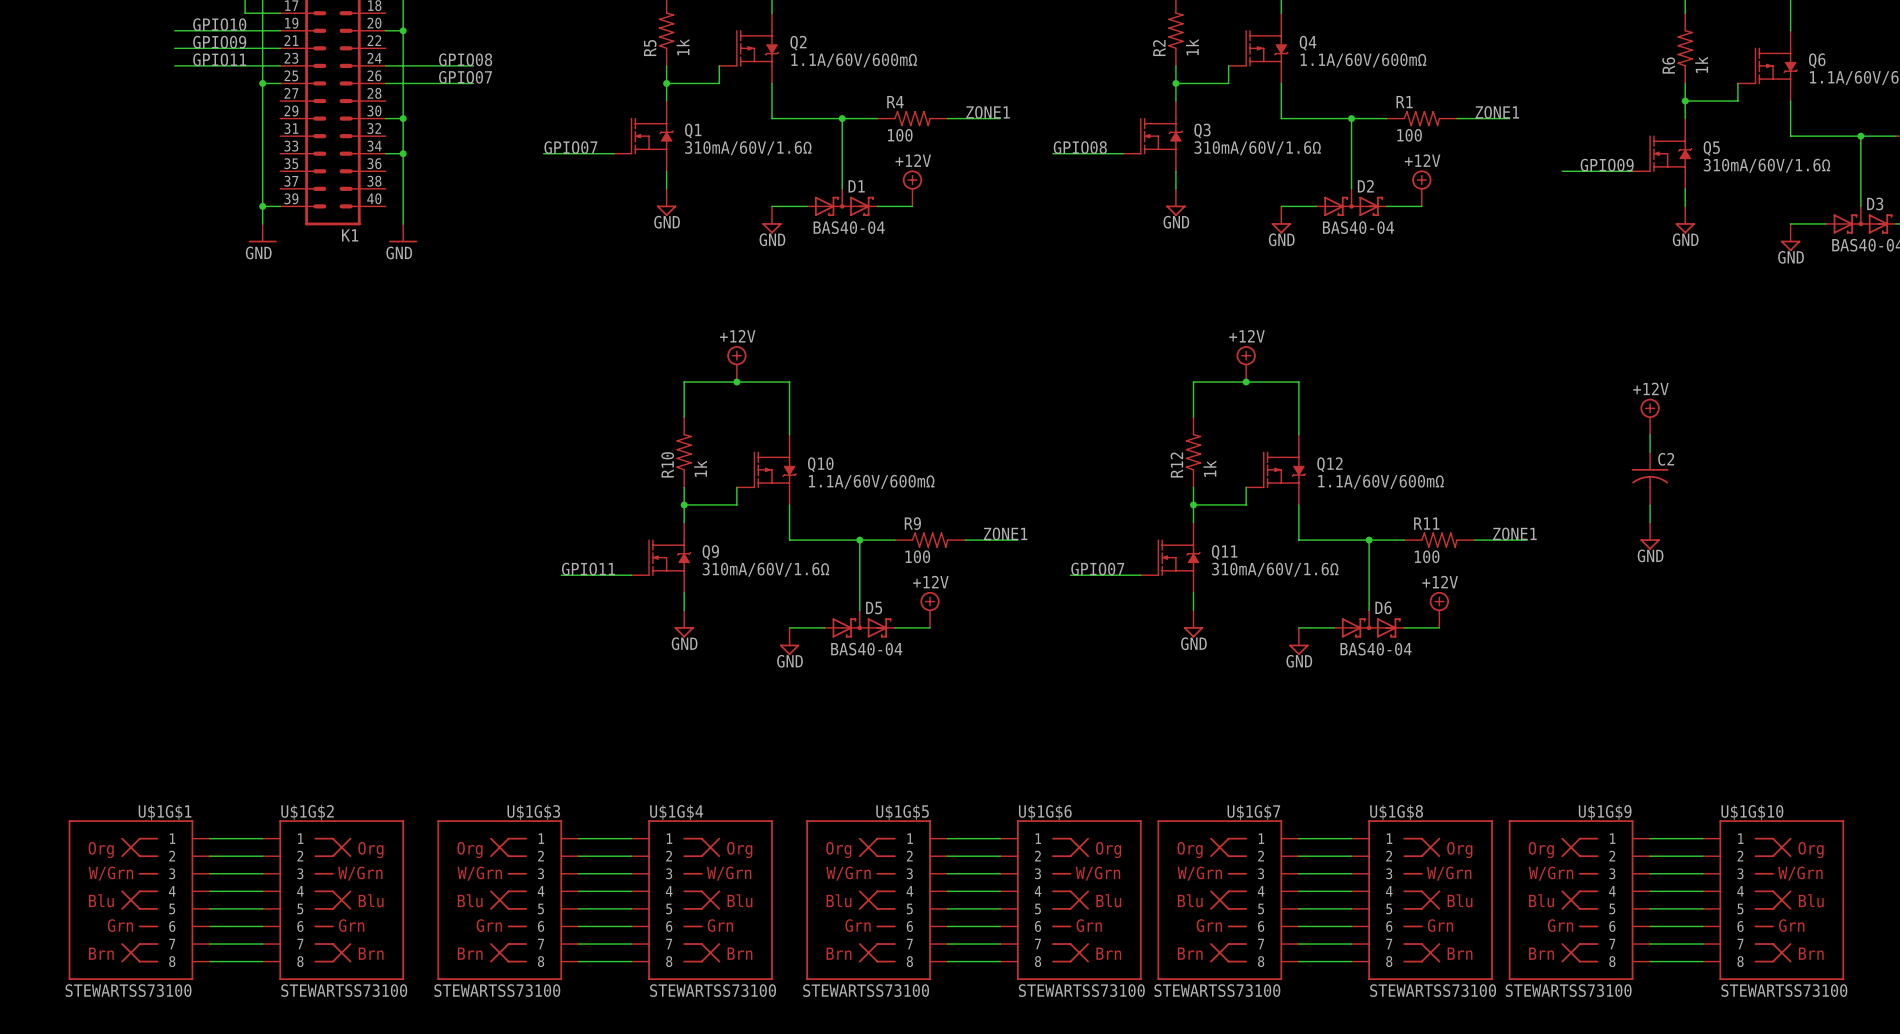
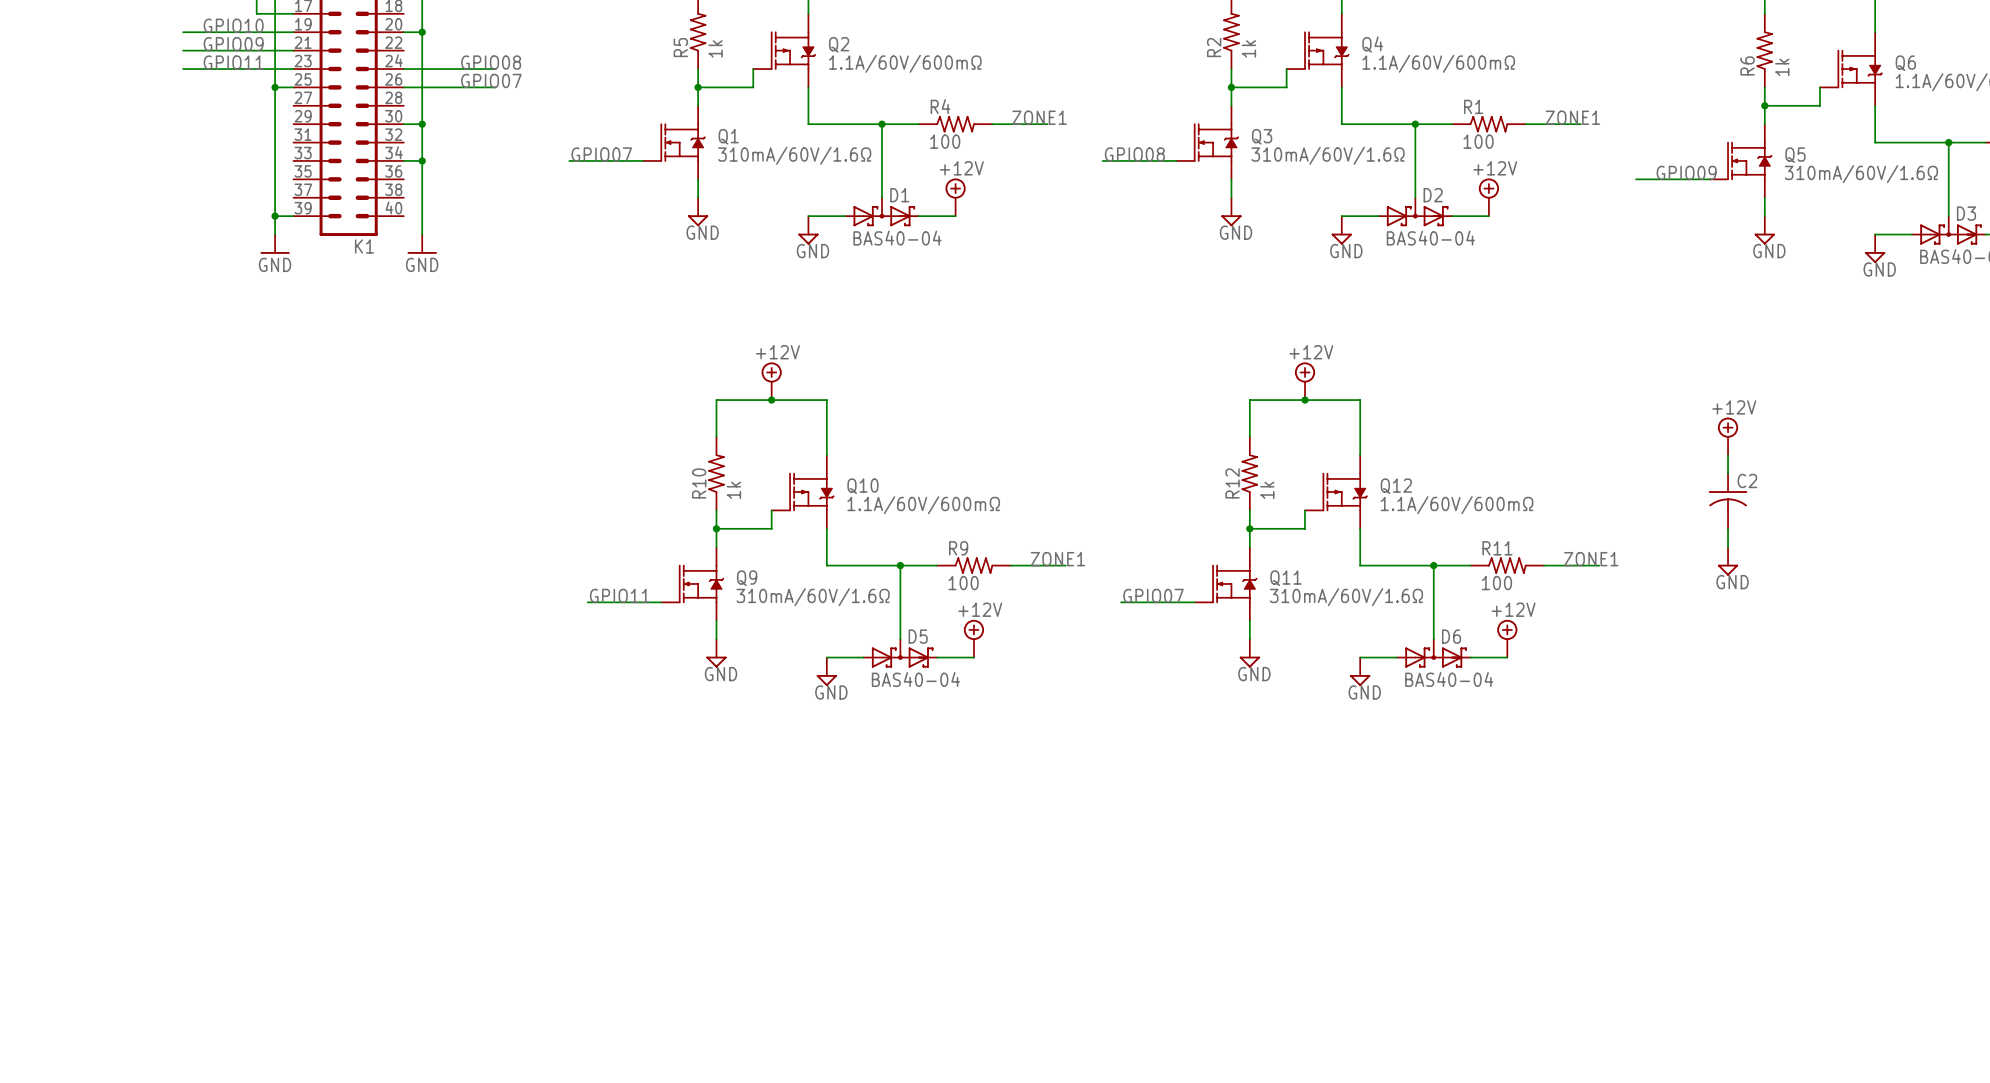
wire: (209, 838) (262, 838) -> none
wire: (578, 838) (631, 838) -> none
wire: (947, 838) (1000, 838) -> none
wire: (1298, 838) (1351, 838) -> none
wire: (1650, 838) (1702, 838) -> none
wire: (209, 856) (262, 856) -> none
wire: (578, 856) (631, 856) -> none
wire: (947, 856) (1000, 856) -> none
wire: (1298, 856) (1351, 856) -> none
wire: (1650, 856) (1702, 856) -> none
wire: (209, 873) (262, 873) -> none
wire: (578, 873) (631, 873) -> none
wire: (947, 873) (1000, 873) -> none
wire: (1298, 873) (1351, 873) -> none
wire: (1650, 873) (1702, 873) -> none
wire: (209, 891) (262, 891) -> none
wire: (578, 891) (631, 891) -> none
wire: (947, 891) (1000, 891) -> none
wire: (1298, 891) (1351, 891) -> none
wire: (1650, 891) (1702, 891) -> none
U$1G$1: STEWARTSS73100 (139, 900) -> none
U$1G$2: STEWARTSS73100 (333, 900) -> none
U$1G$3: STEWARTSS73100 (508, 900) -> none
U$1G$4: STEWARTSS73100 (702, 900) -> none
U$1G$5: STEWARTSS73100 (876, 900) -> none
U$1G$6: STEWARTSS73100 (1070, 900) -> none
U$1G$7: STEWARTSS73100 (1228, 900) -> none
U$1G$8: STEWARTSS73100 (1422, 900) -> none
U$1G$9: STEWARTSS73100 (1579, 900) -> none
U$1G$10: STEWARTSS73100 (1773, 900) -> none
wire: (209, 908) (262, 908) -> none
wire: (578, 908) (631, 908) -> none
wire: (947, 908) (1000, 908) -> none
wire: (1298, 908) (1351, 908) -> none
wire: (1650, 908) (1702, 908) -> none
wire: (209, 926) (262, 926) -> none
wire: (578, 926) (631, 926) -> none
wire: (947, 926) (1000, 926) -> none
wire: (1298, 926) (1351, 926) -> none
wire: (1650, 926) (1702, 926) -> none
wire: (209, 944) (262, 944) -> none
wire: (578, 944) (631, 944) -> none
wire: (947, 944) (1000, 944) -> none
wire: (1298, 944) (1351, 944) -> none
wire: (1650, 944) (1702, 944) -> none
wire: (209, 961) (262, 961) -> none
wire: (578, 961) (631, 961) -> none
wire: (947, 961) (1000, 961) -> none
wire: (1298, 961) (1351, 961) -> none
wire: (1650, 961) (1702, 961) -> none

